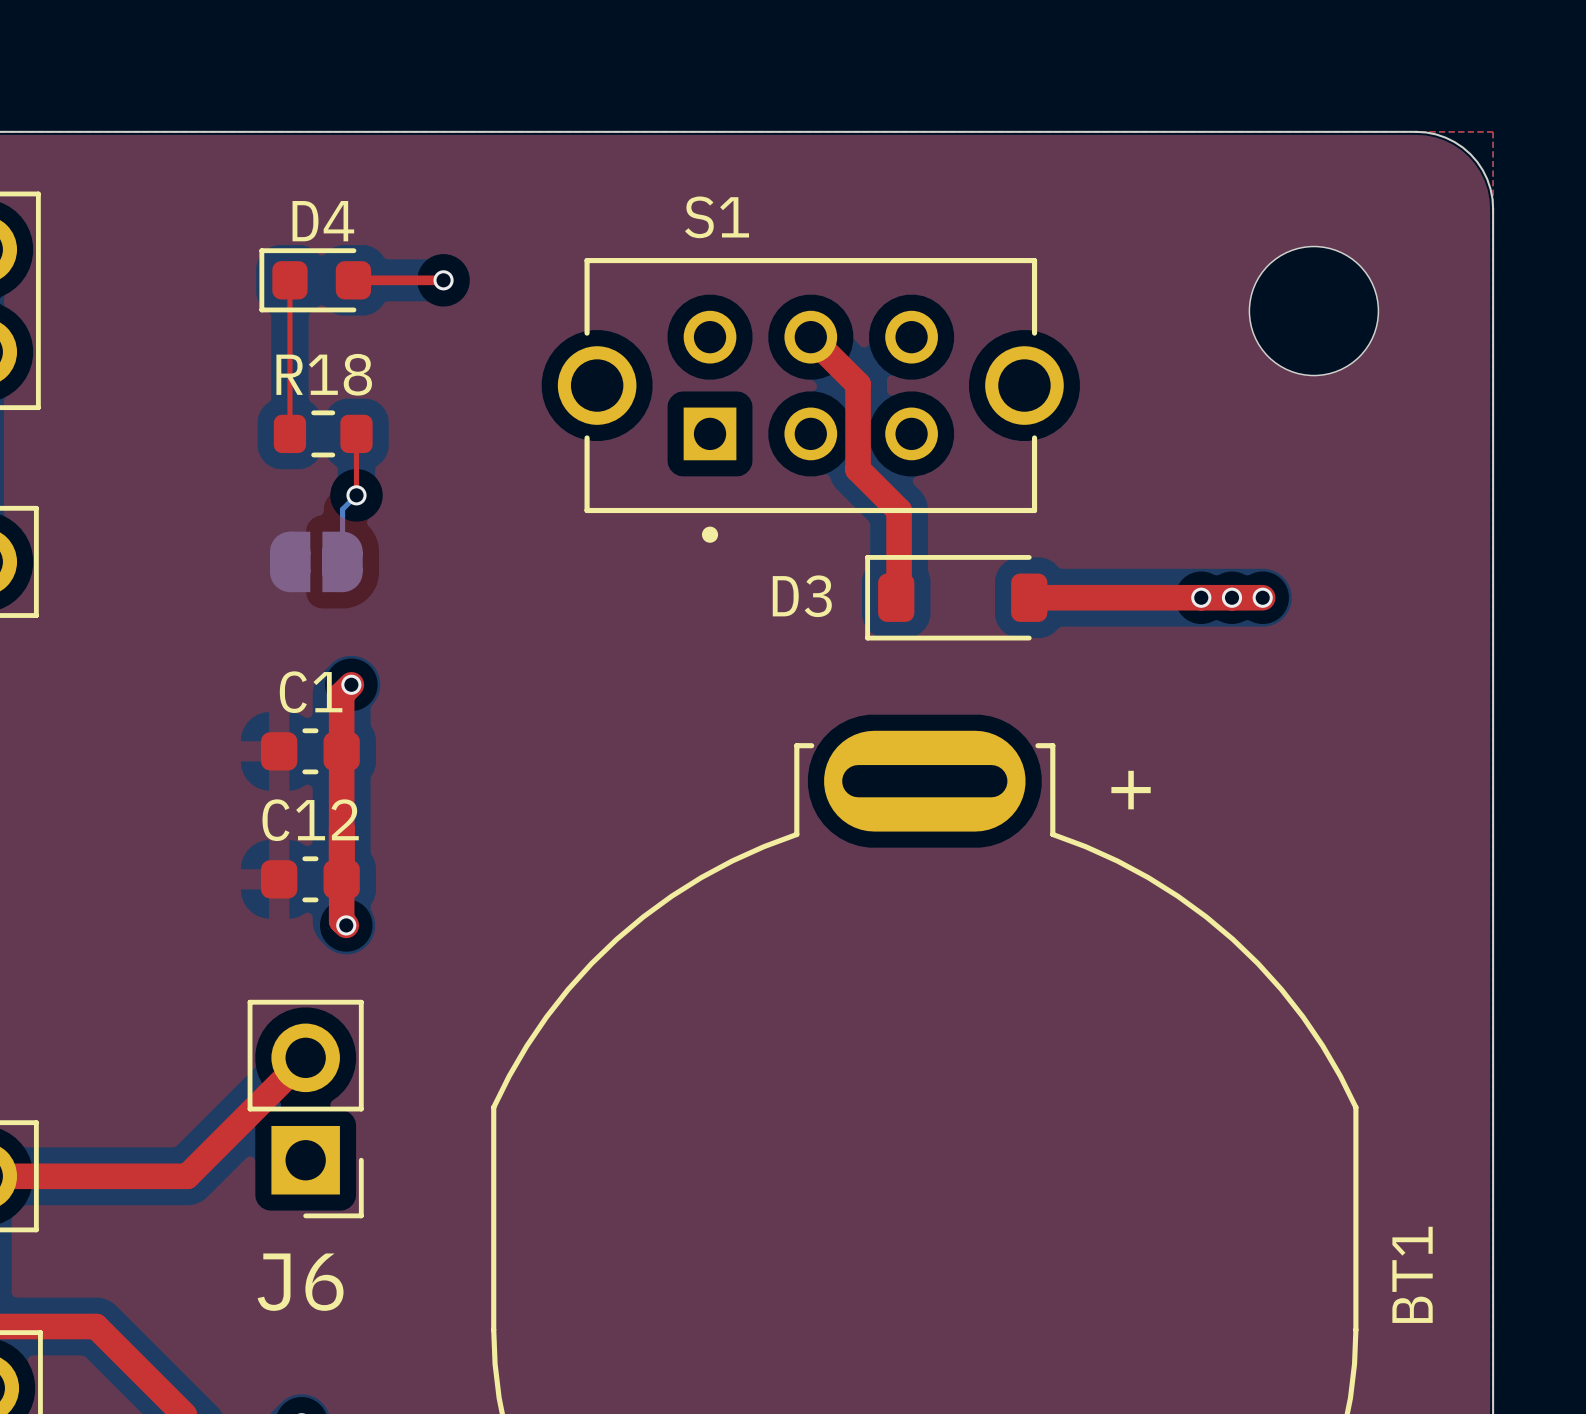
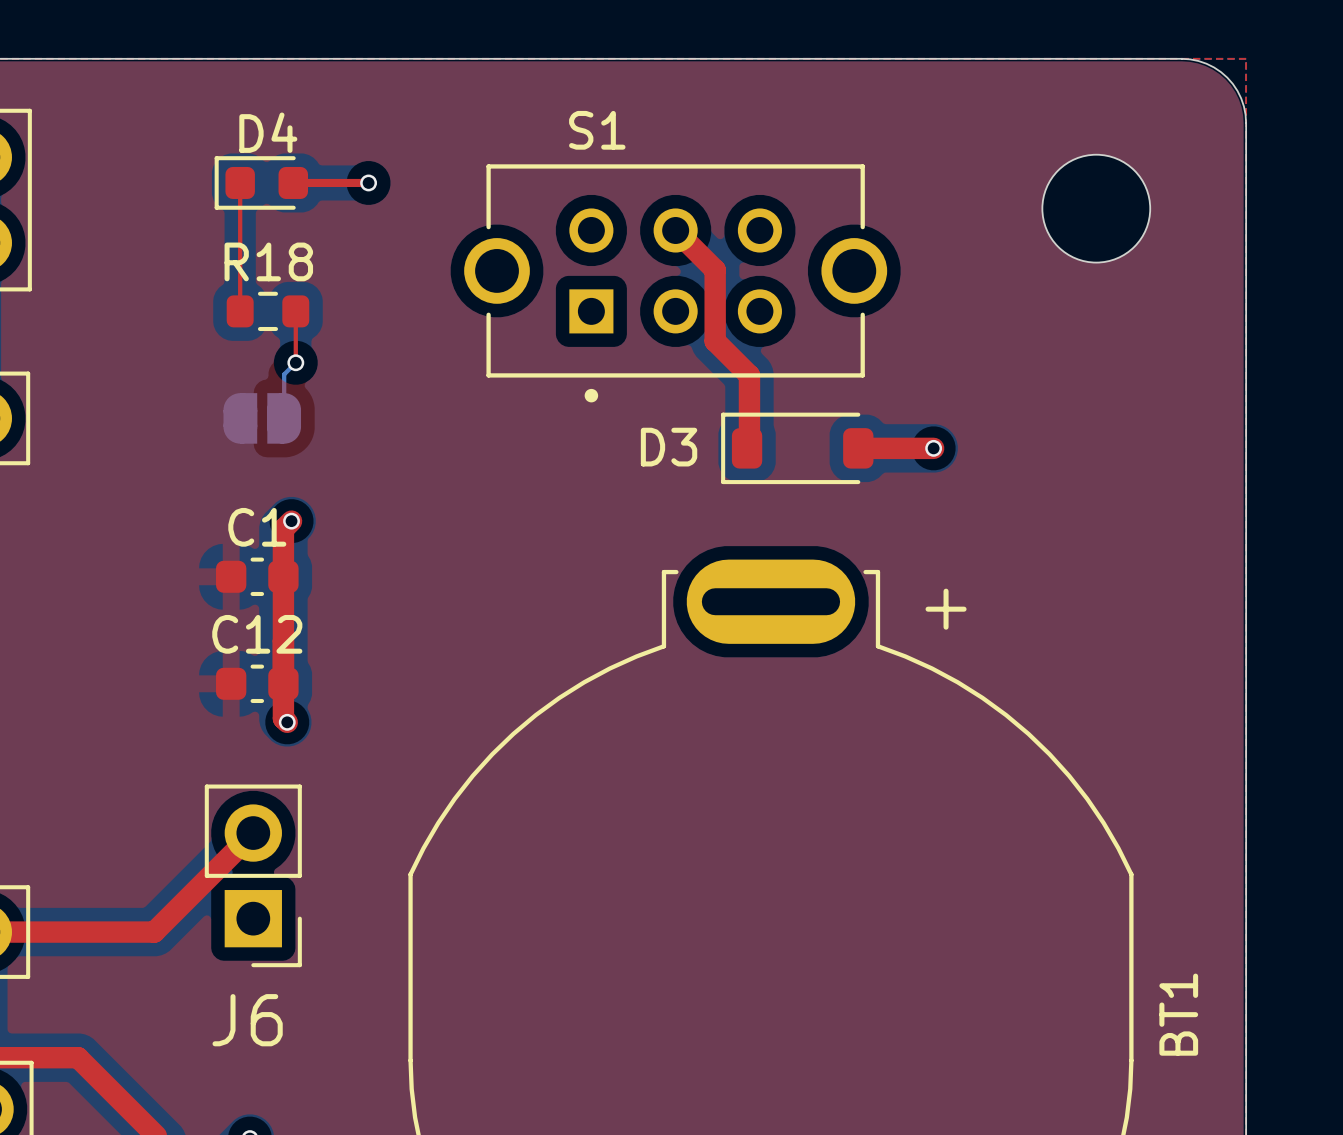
top track: (1119, 597) (1262, 597) -> none
via: none -> (933, 448)
via: (1201, 597) -> none
via: (1232, 597) -> none
via: (1262, 597) -> none

